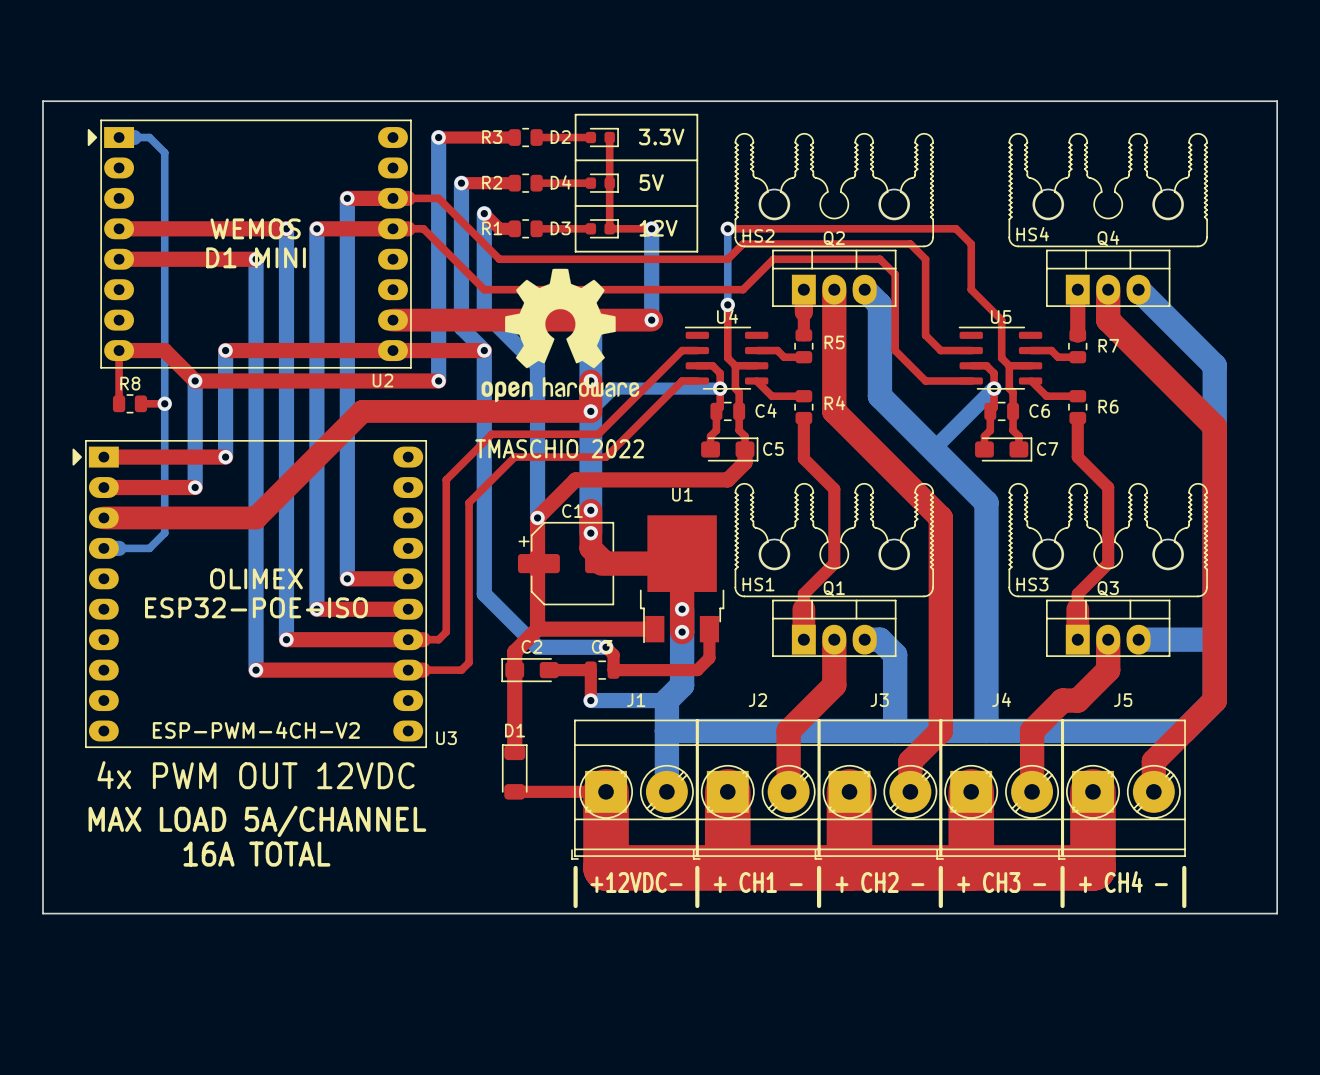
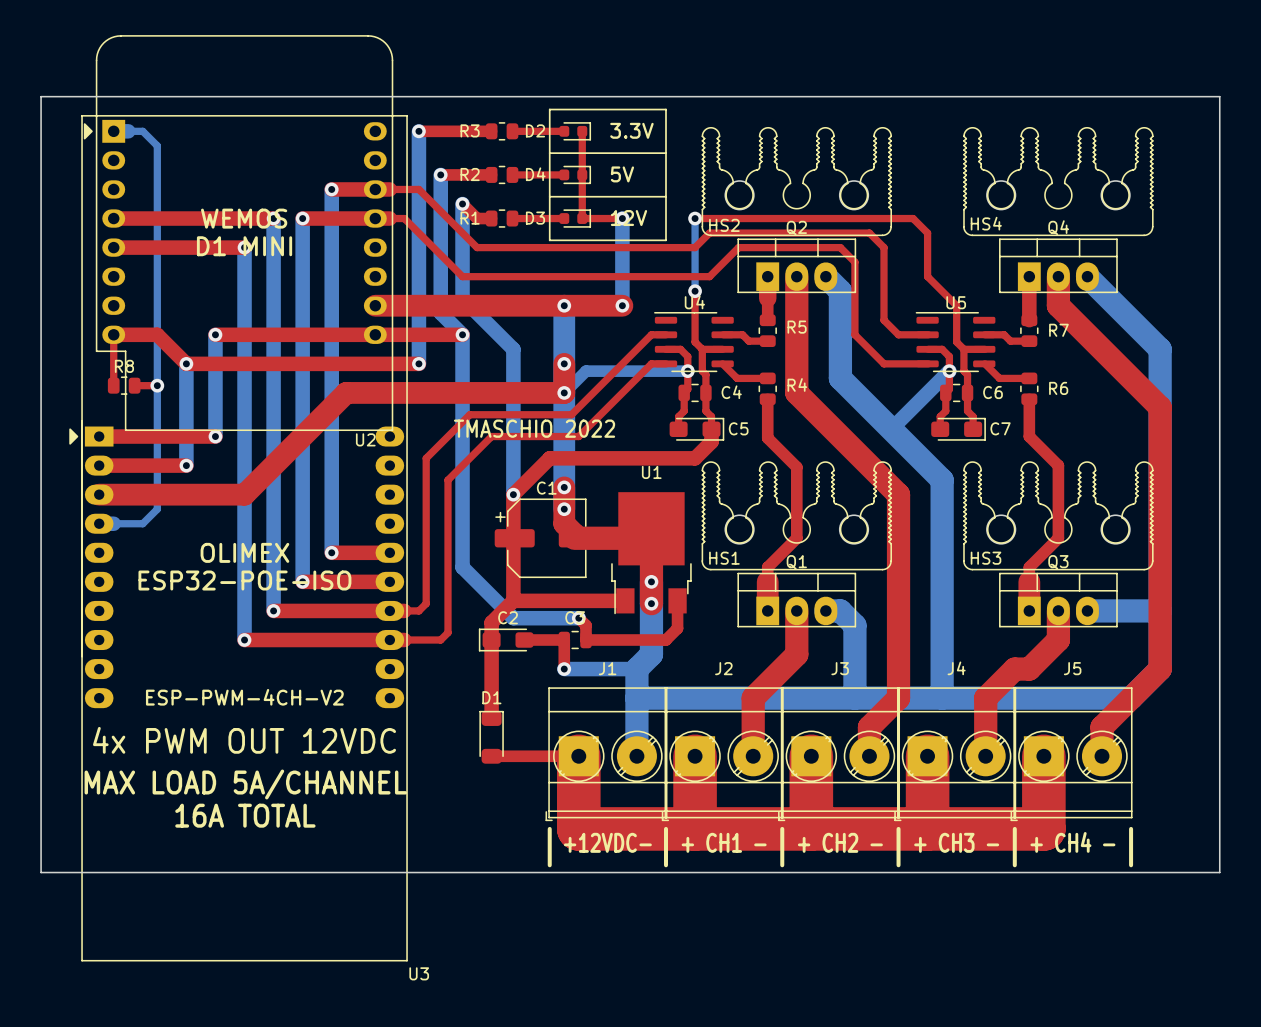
U2 footprint: [87, 119, 412, 369] -> [83, 35, 394, 431]
drawing: [481, 268, 640, 403] -> none
U2 name position: U2 (382, 380) -> U2 (365, 439)
U3 footprint: [72, 440, 427, 748] -> [69, 115, 408, 962]
U3 name position: U3 (446, 738) -> U3 (419, 973)

